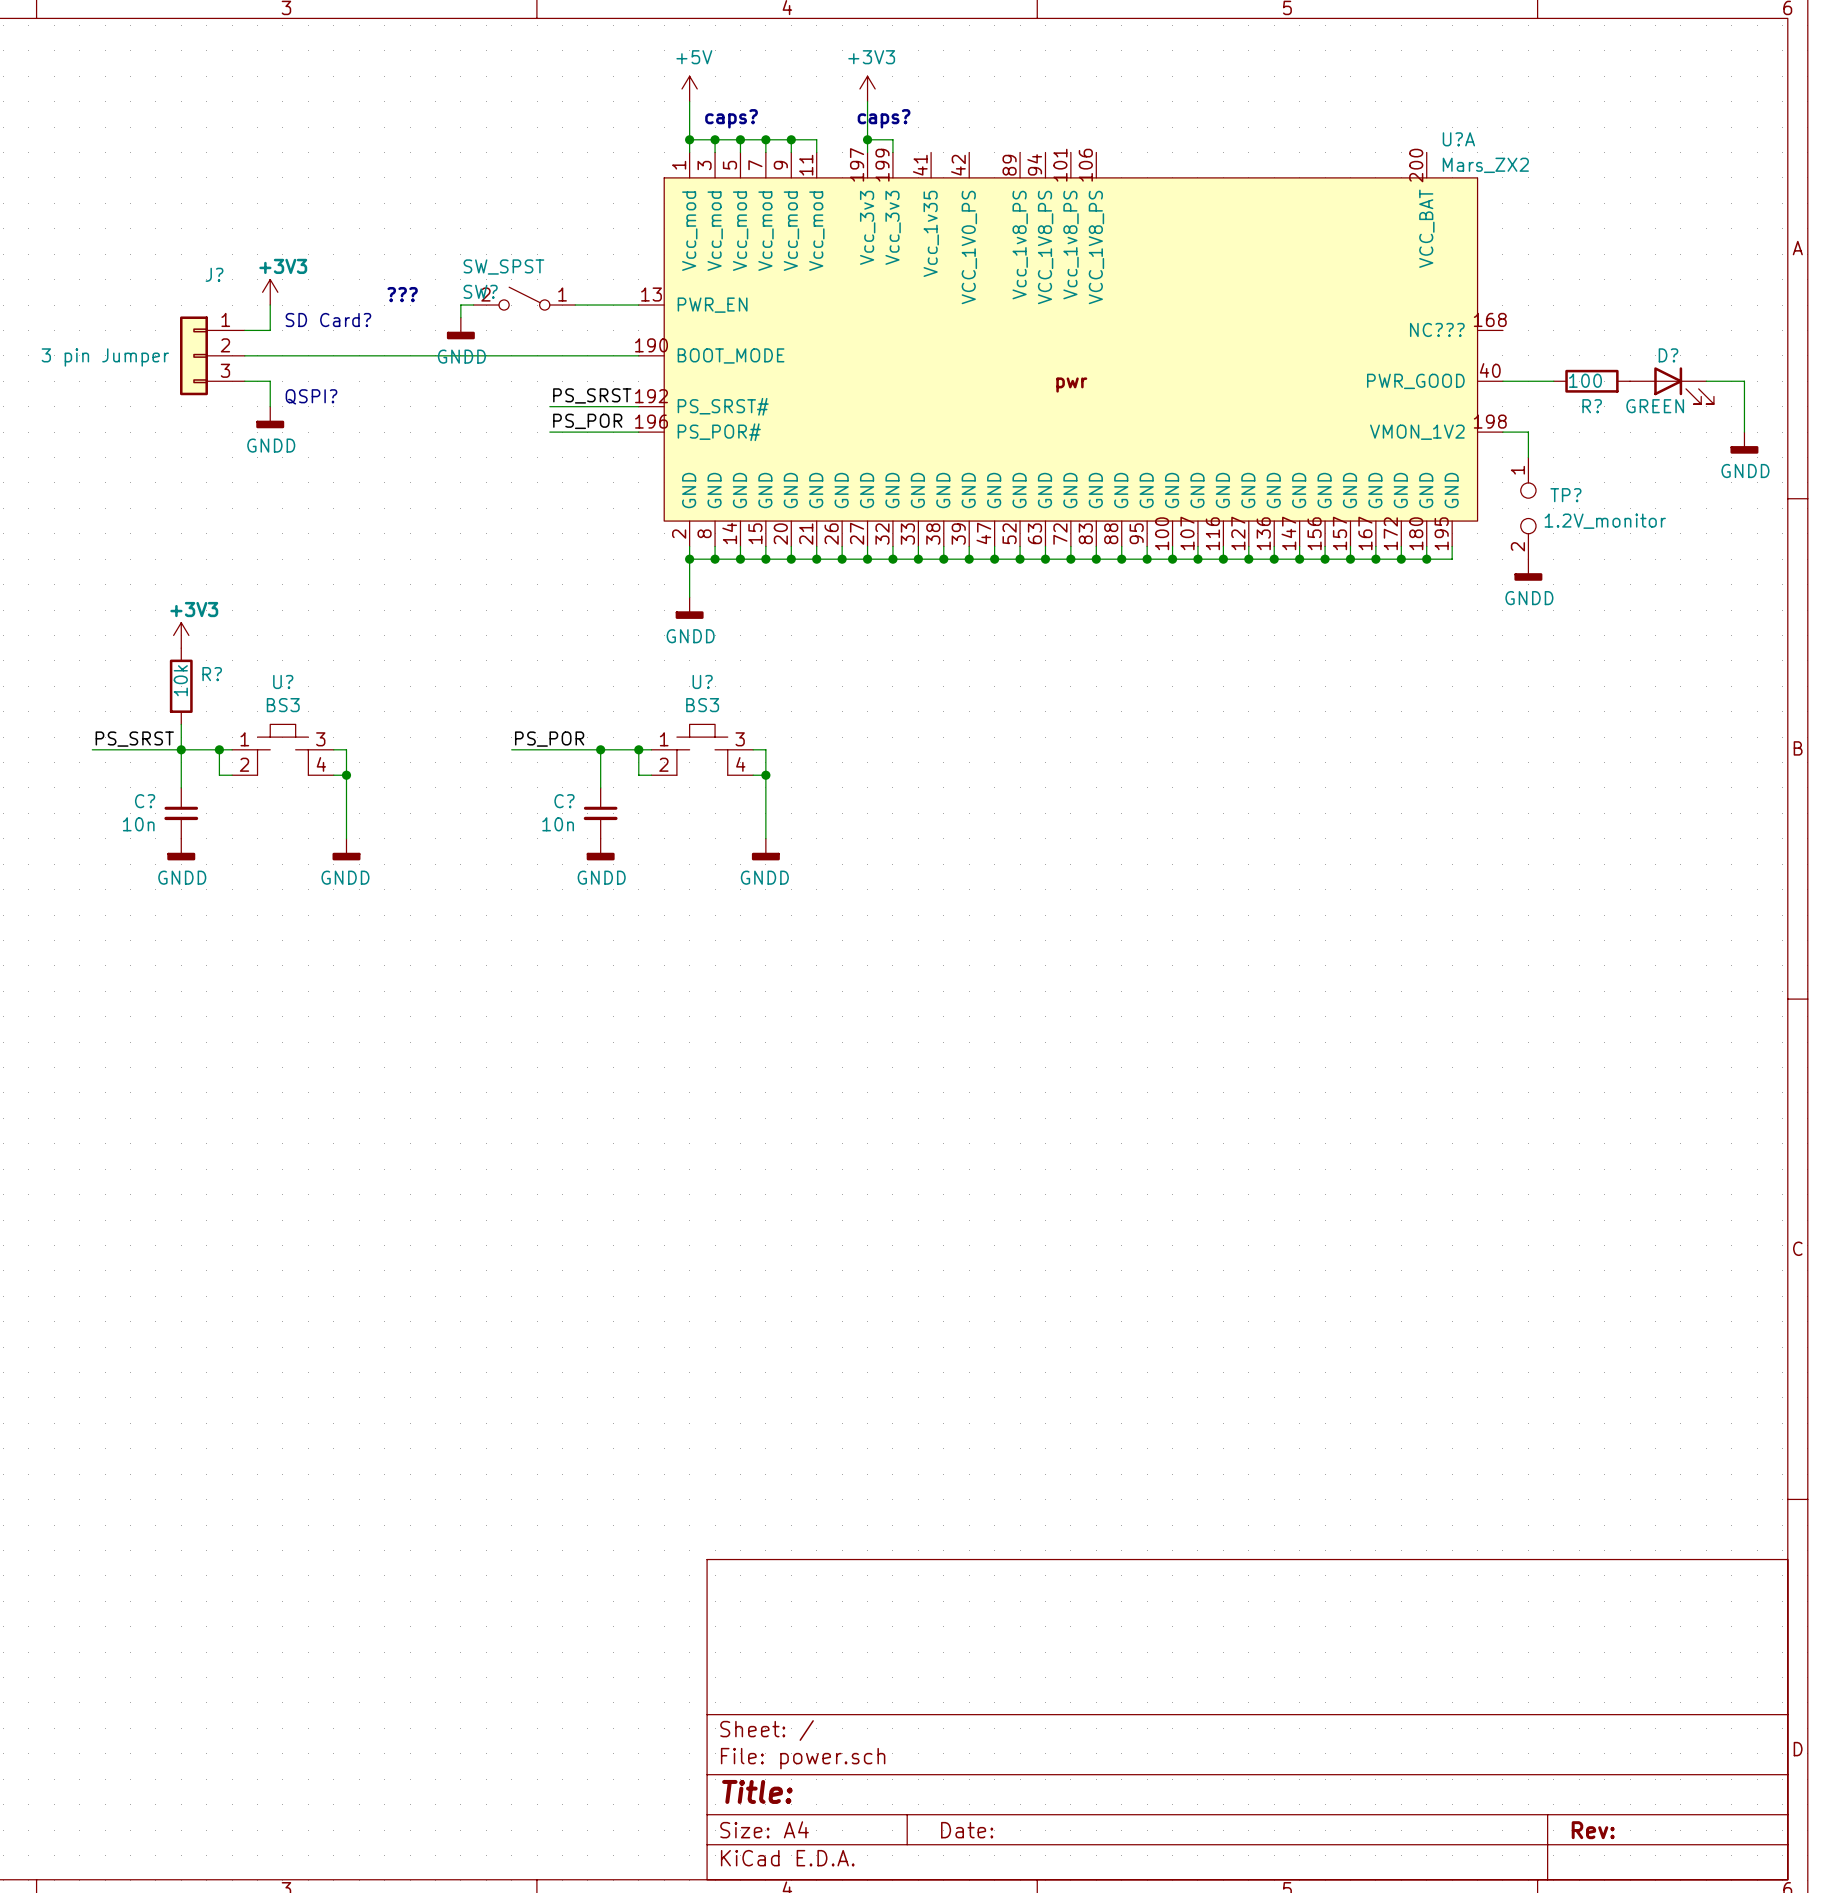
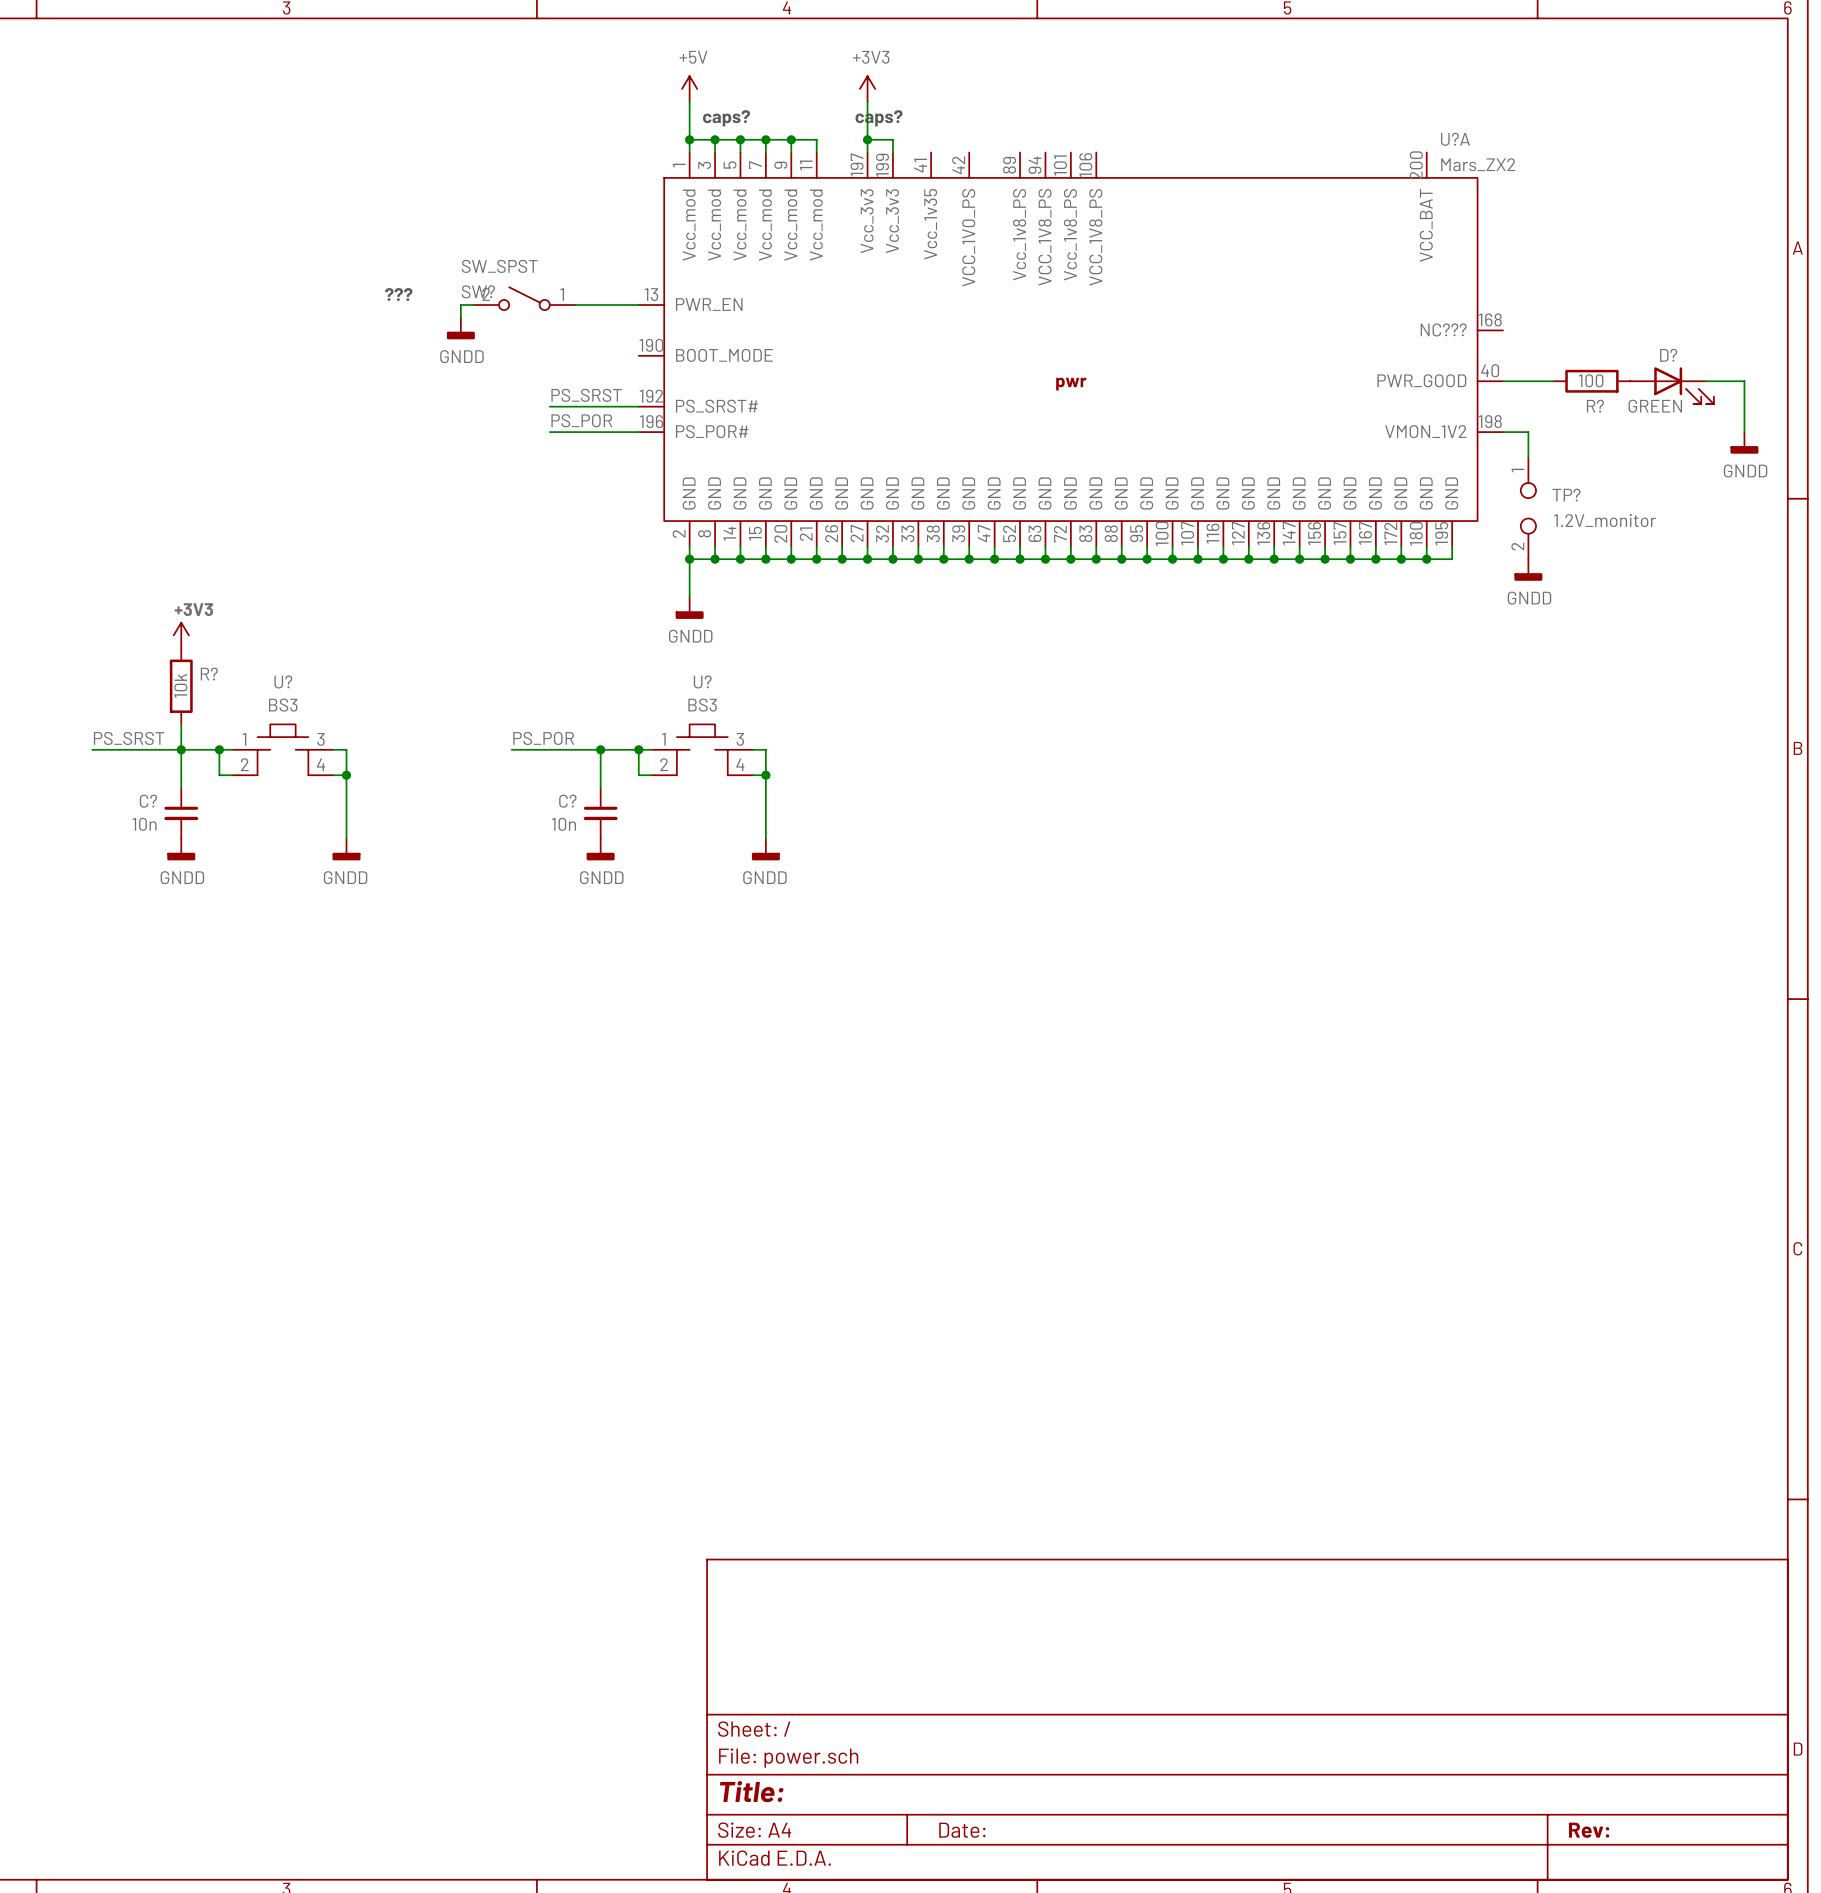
power symbol: +3V3 (270, 292) -> none
wire: (270, 305) (270, 330) (244, 330) -> none
text: SD Card? (328, 320) -> none
J?: 3 pin Jumper (212, 355) -> none
wire: (244, 355) (638, 355) -> none
wire: (244, 381) (270, 381) (270, 406) -> none
text: QSPI? (311, 396) -> none
power symbol: GNDD (270, 417) -> none

